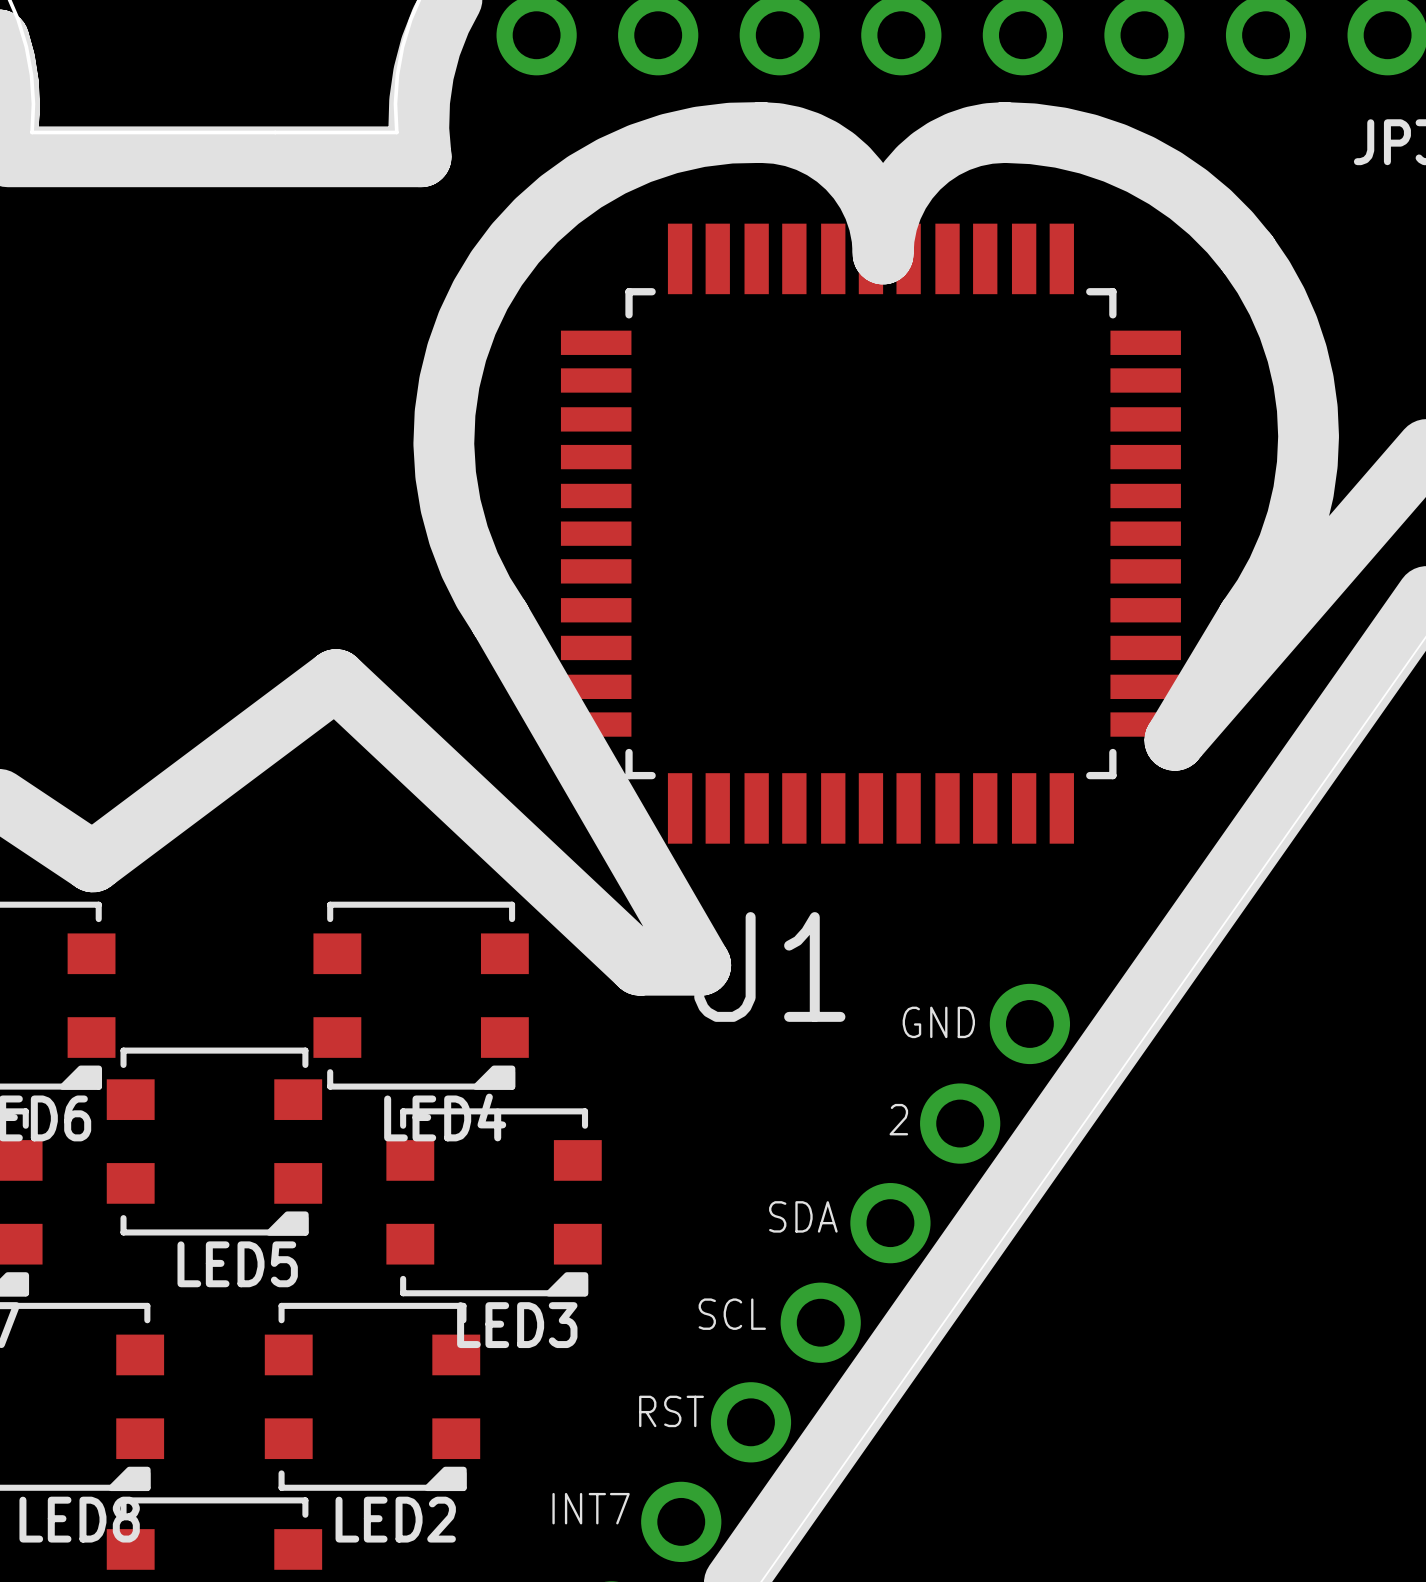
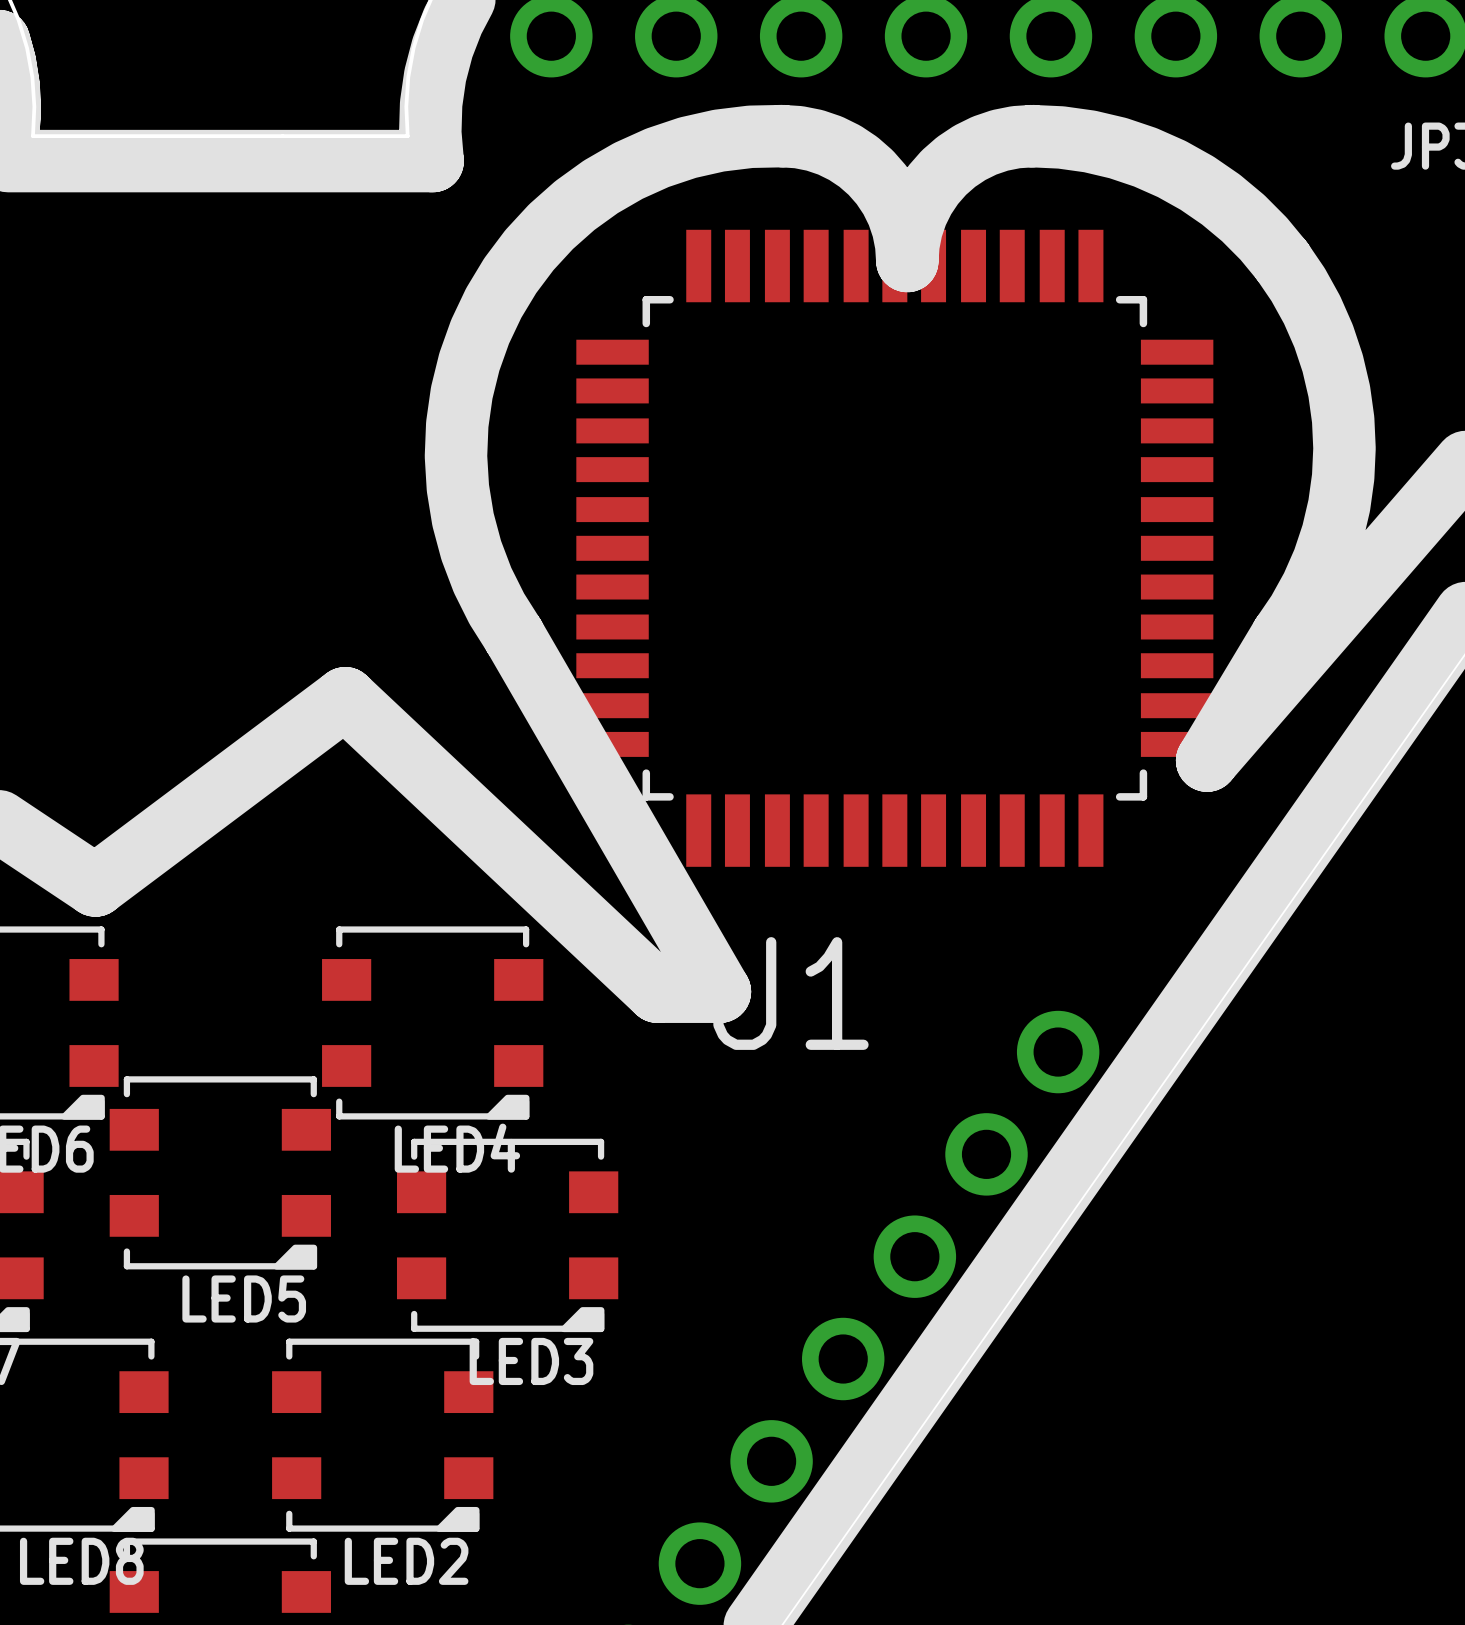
text: GND (938, 1022) -> none
text: 2 (898, 1119) -> none
text: SDA (803, 1216) -> none
text: SCL (732, 1314) -> none
text: RST (671, 1411) -> none
text: INT7 (591, 1508) -> none

